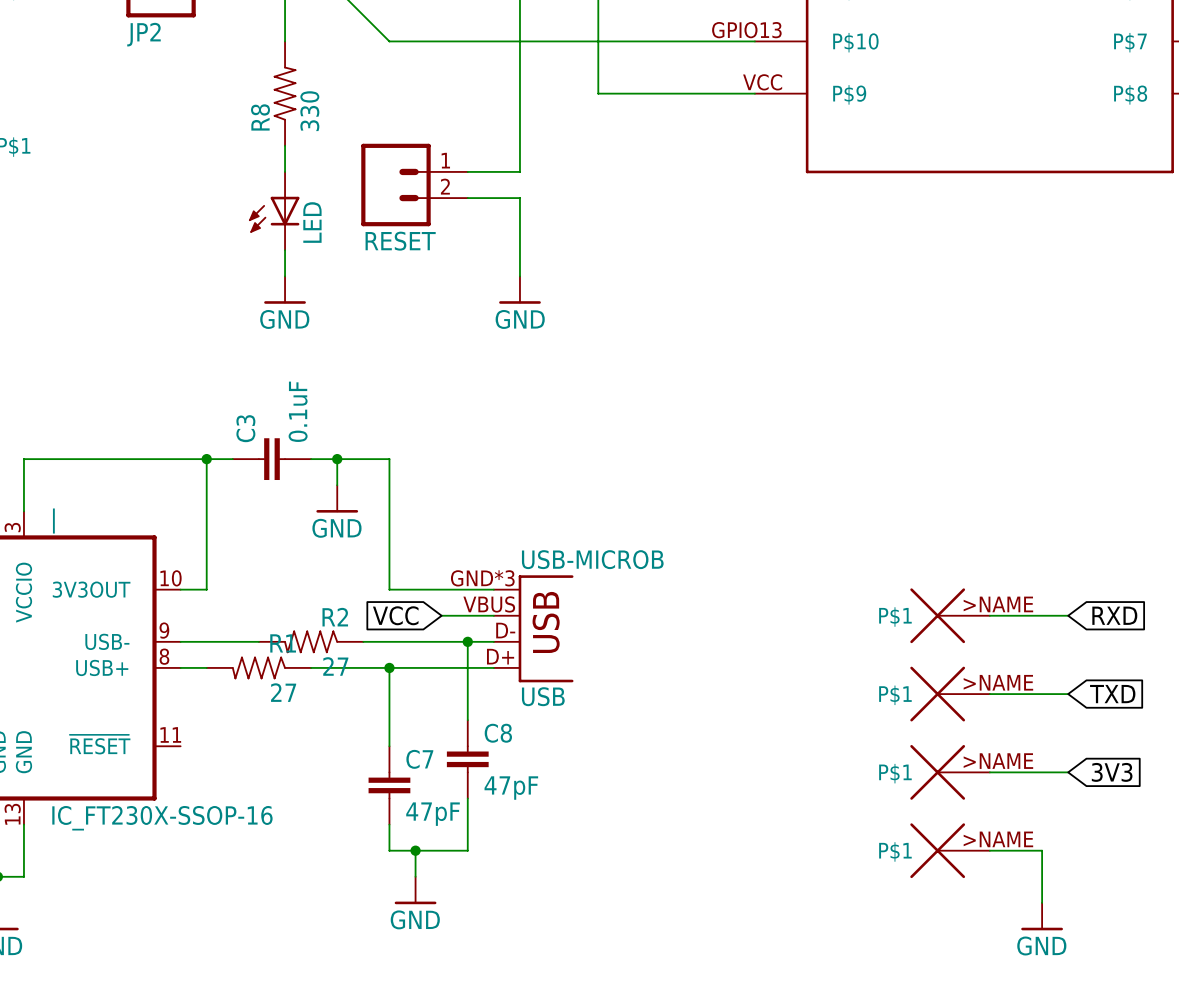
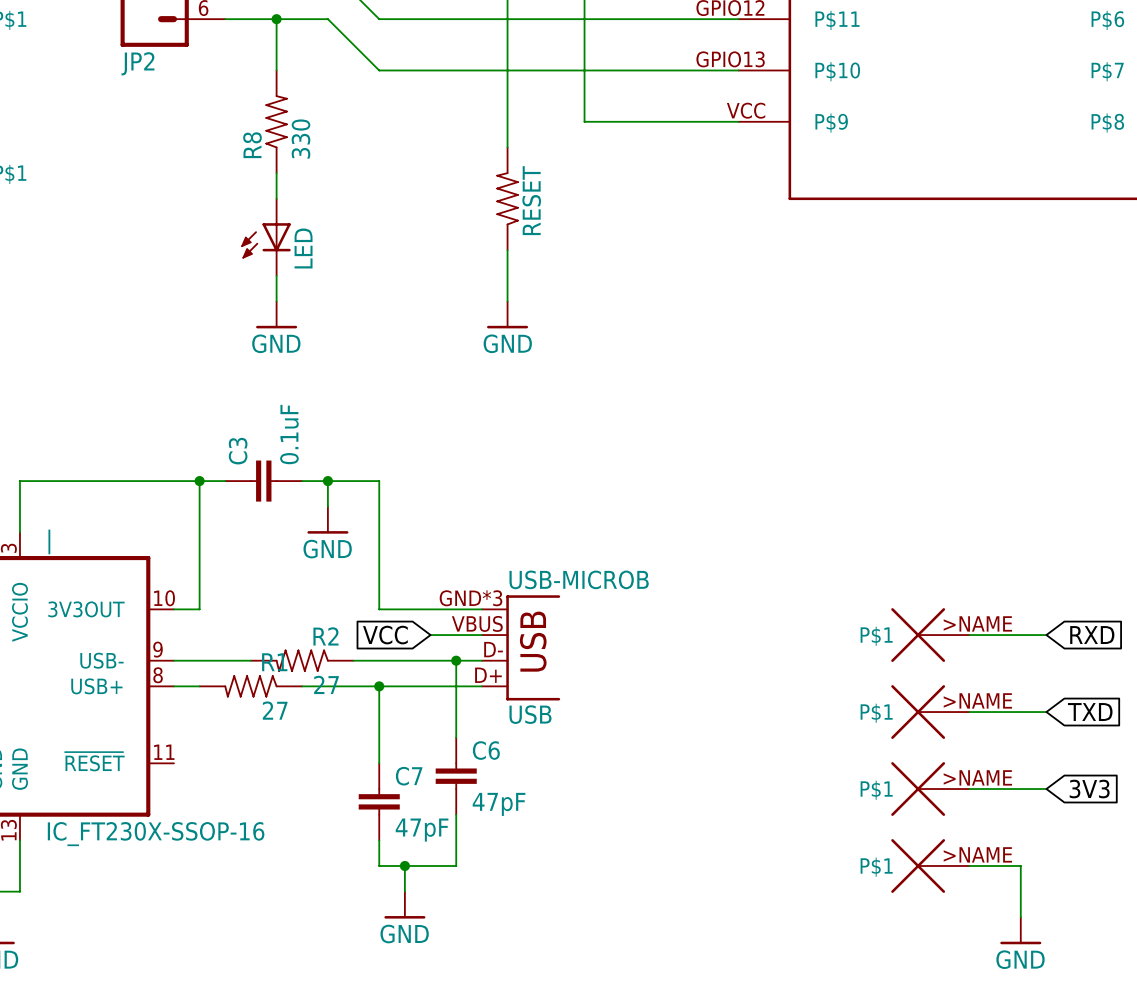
wire: (519, 119) (519, 171) (467, 171) -> none
RESET: none -> (507, 198)
RESET: (414, 185) -> none
wire: (467, 198) (519, 198) (519, 224) -> none
C8 name: C8 (498, 733) -> C6 (486, 750)

